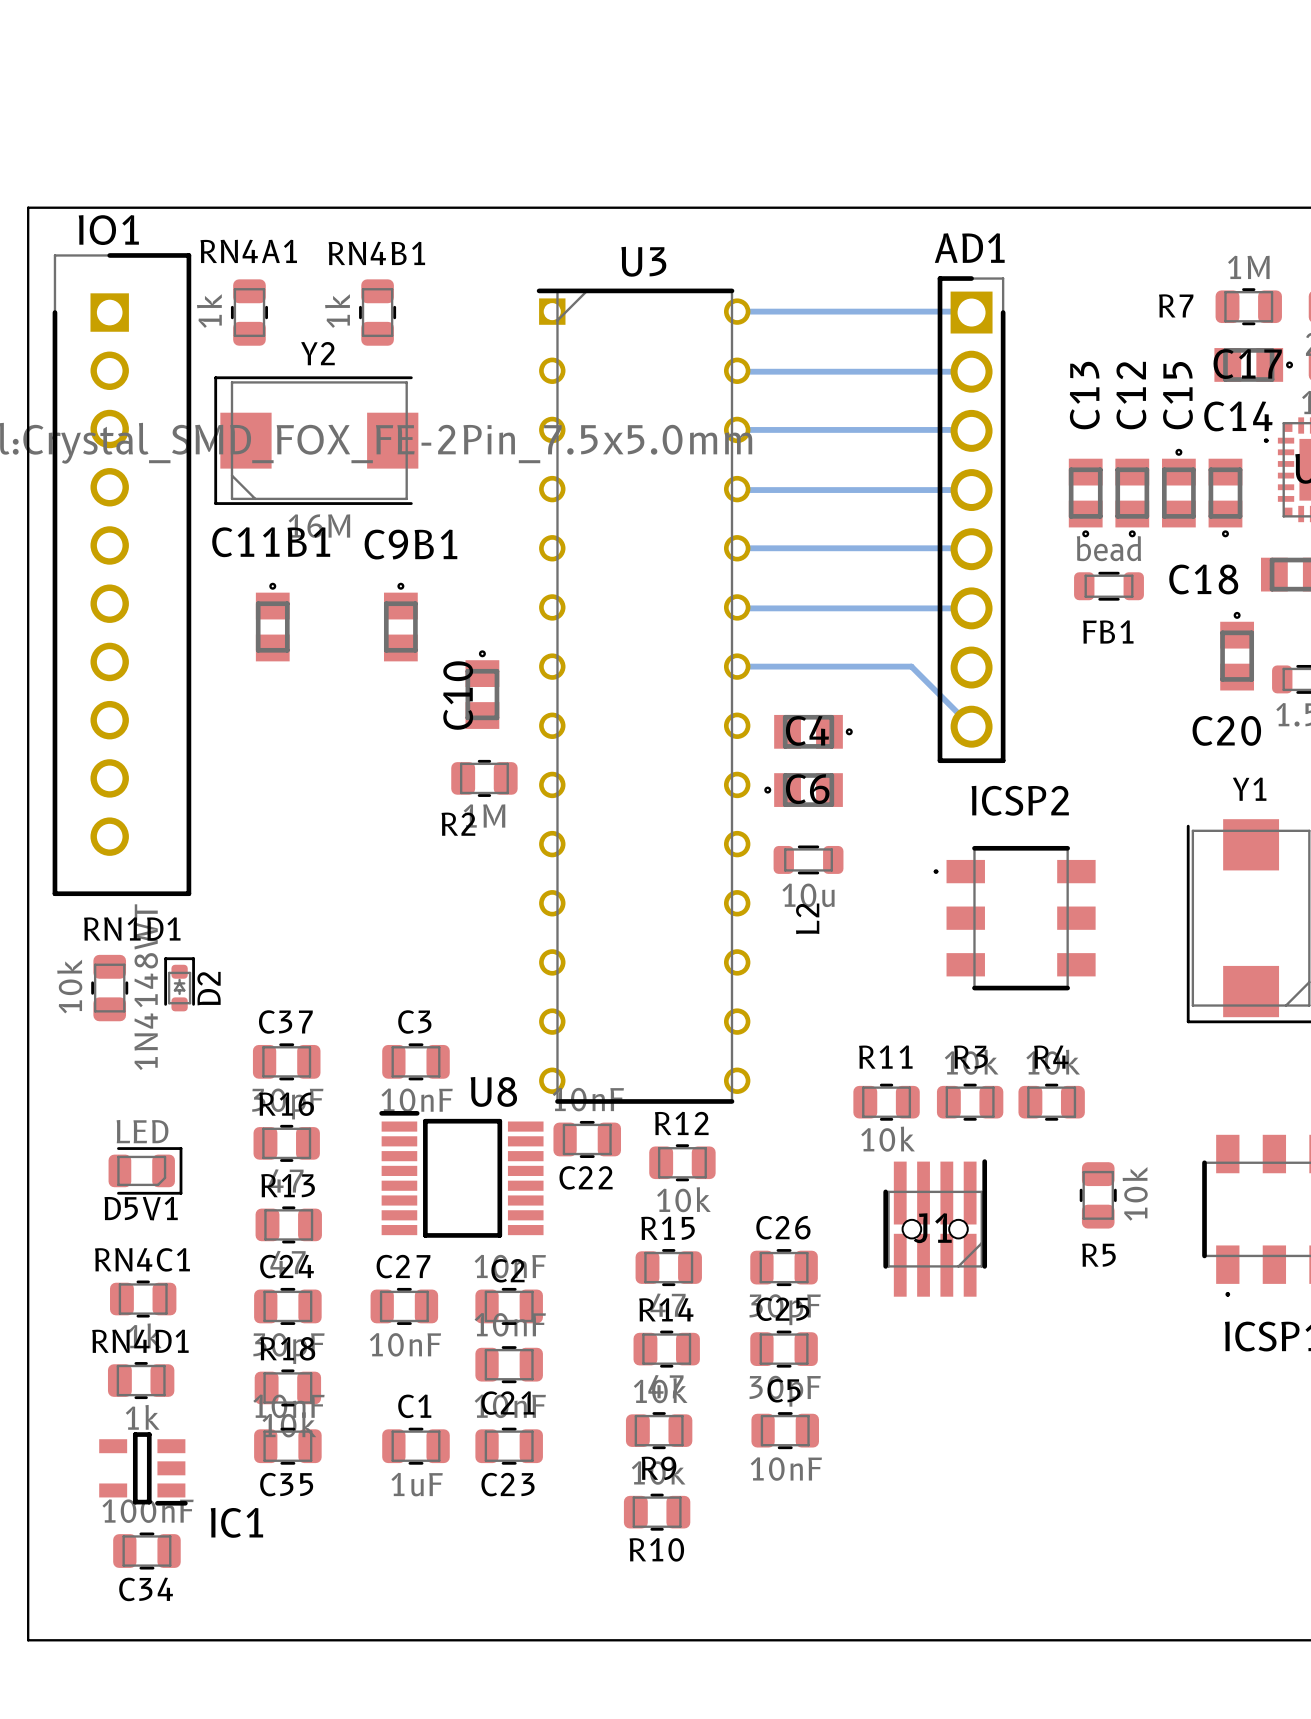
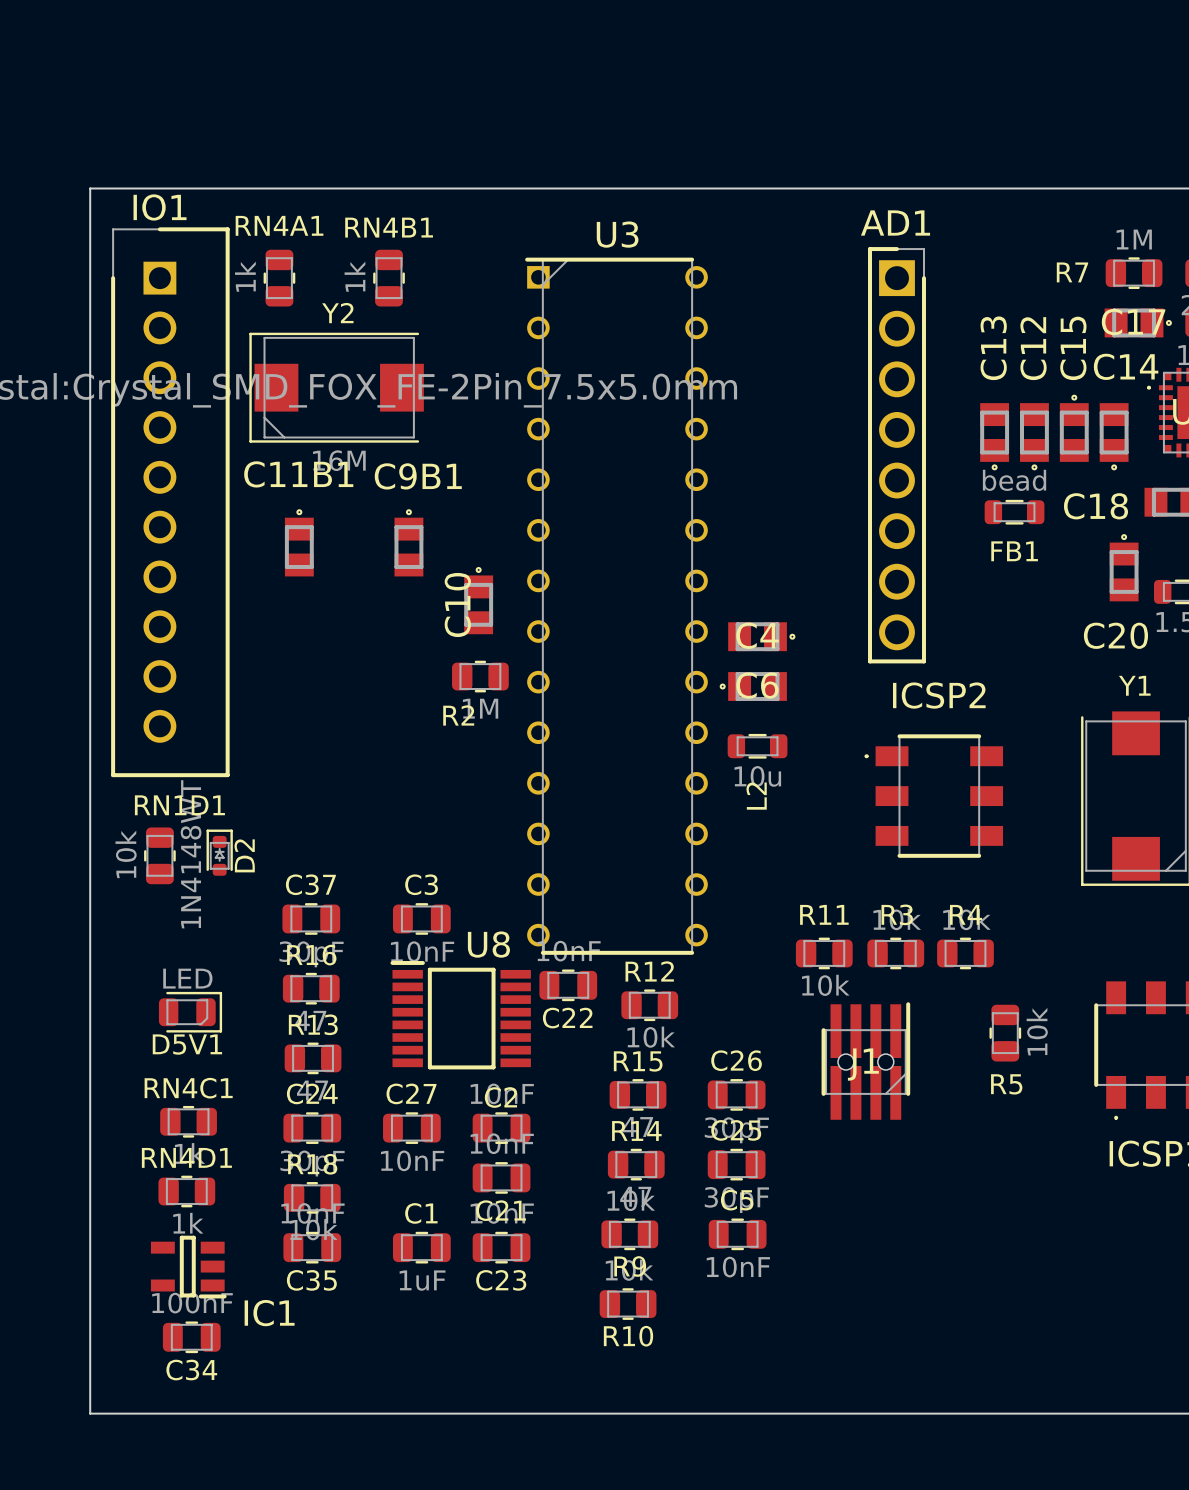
bottom track: (737, 311) (971, 312) -> none
bottom track: (737, 370) (971, 371) -> none
bottom track: (737, 429) (971, 430) -> none
bottom track: (737, 489) (971, 490) -> none
bottom track: (737, 548) (971, 549) -> none
bottom track: (737, 607) (971, 608) -> none
bottom track: (737, 666) (911, 666) (971, 726) -> none

